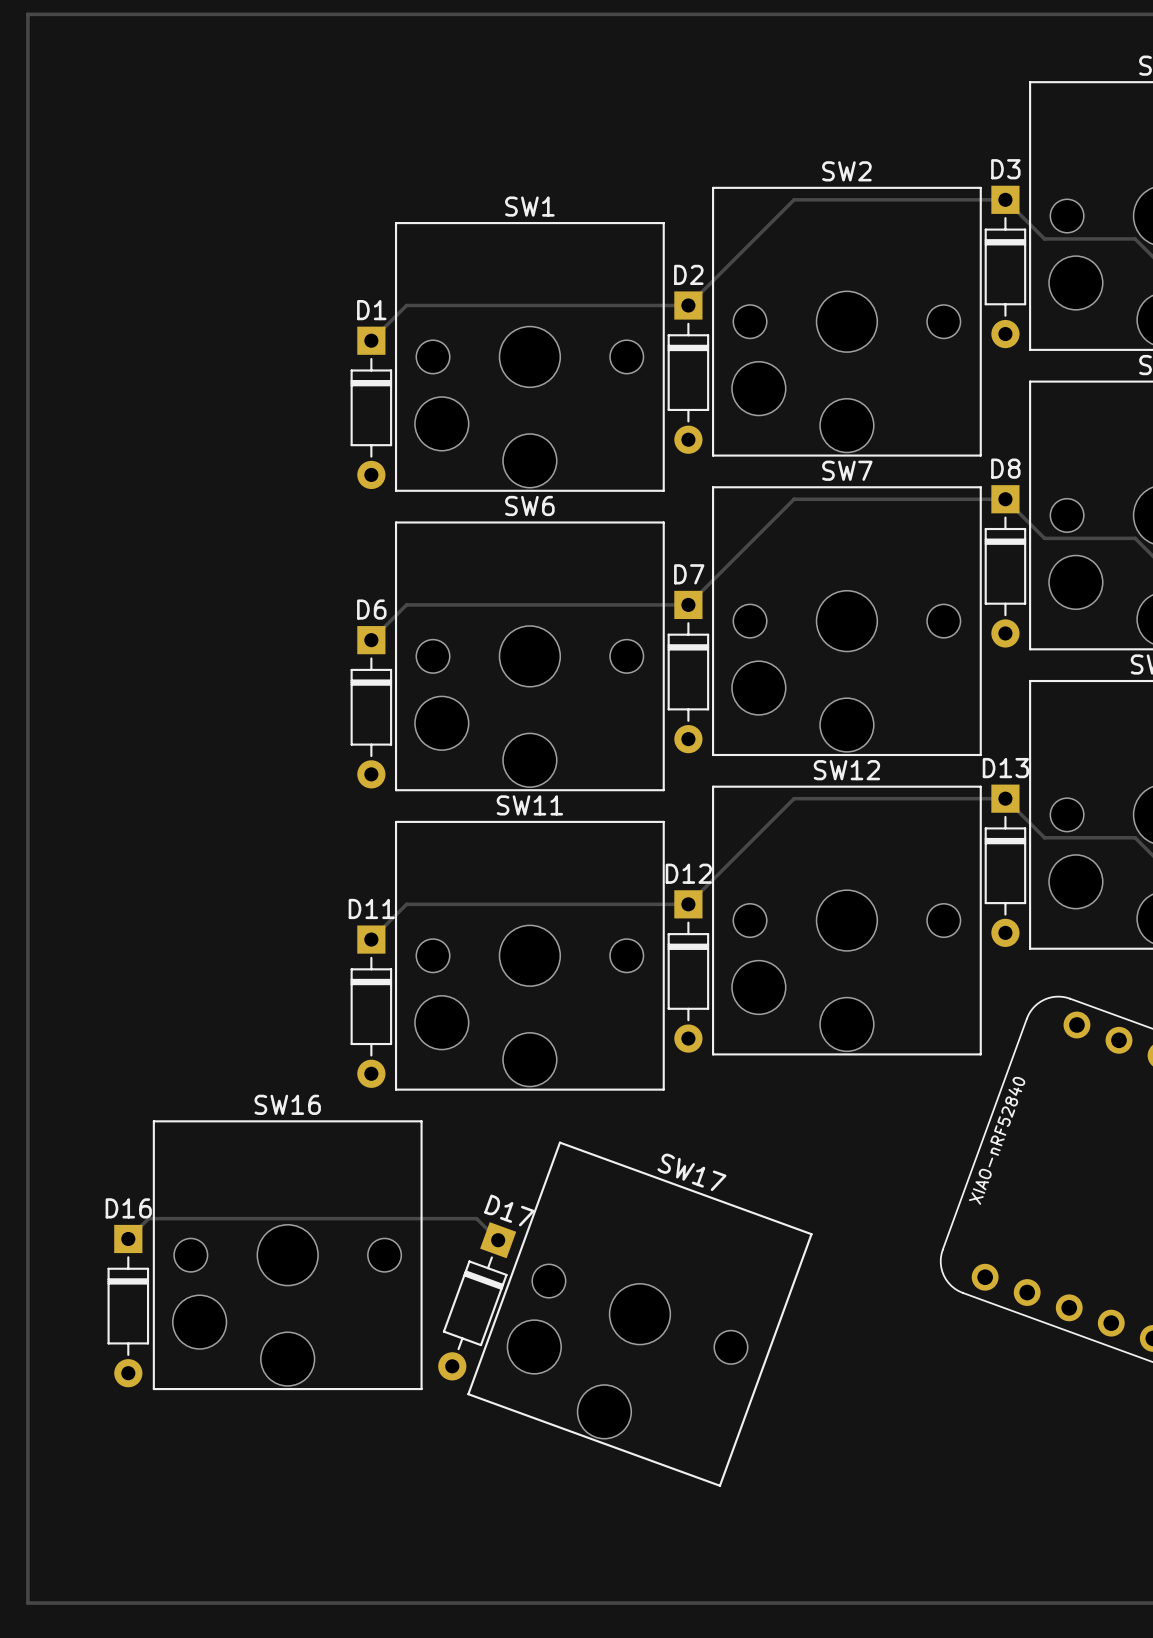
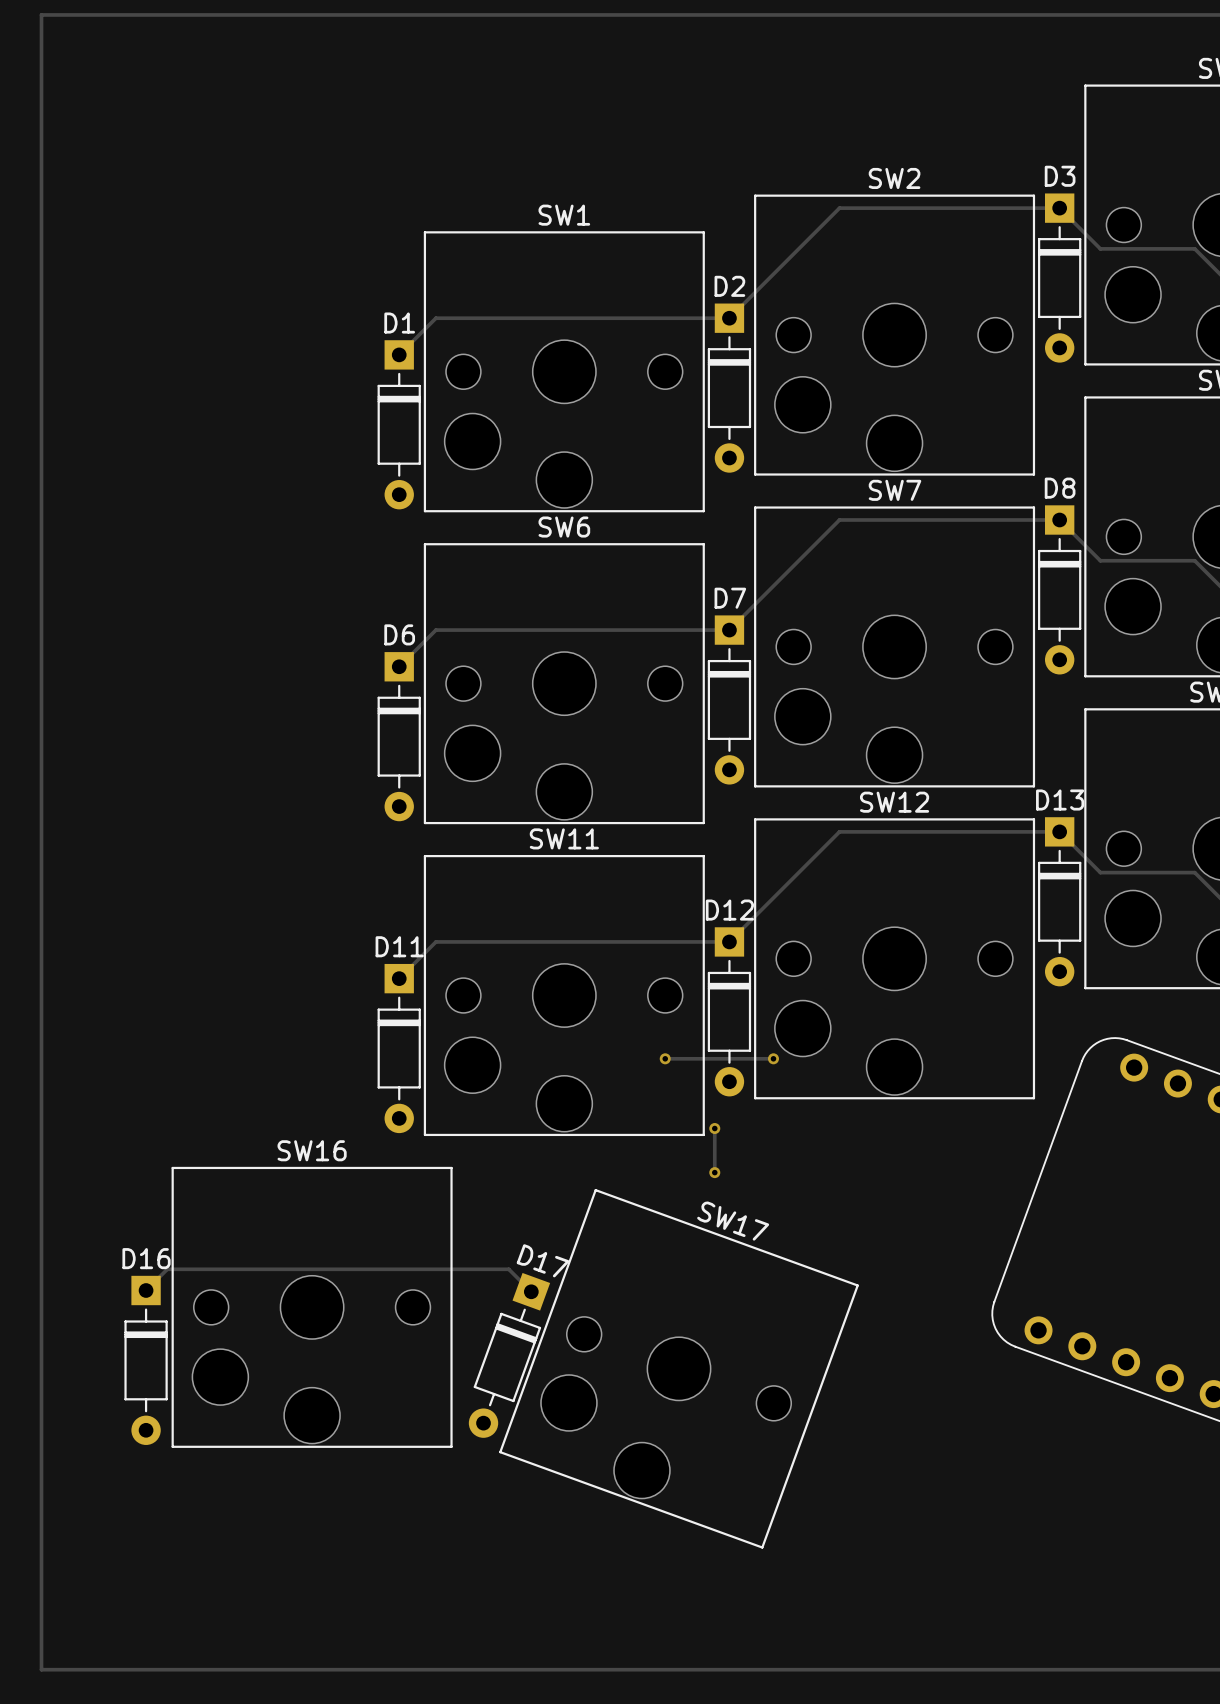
track: none -> (665, 1058) (773, 1058)
via: none -> (665, 1058)
via: none -> (773, 1058)
track: none -> (714, 1128) (714, 1172)
via: none -> (714, 1128)
via: none -> (714, 1172)
part value: XIAO-nRF52840 (997, 1140) -> none

